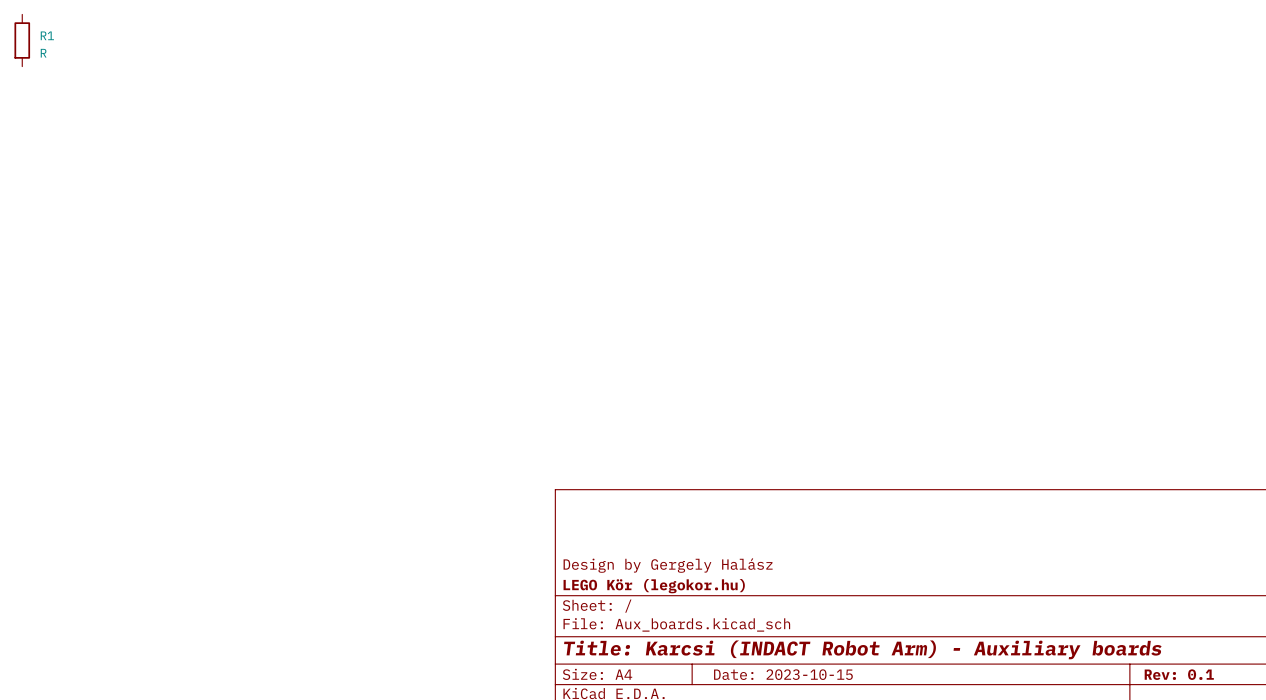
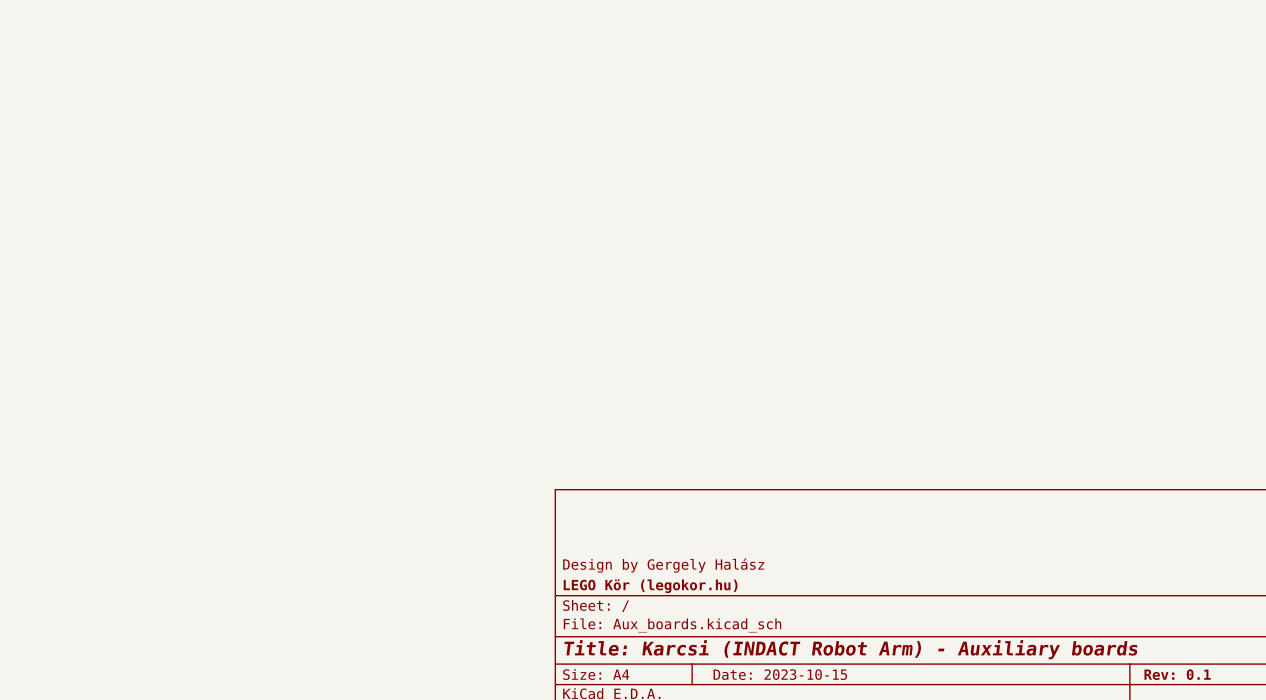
R1: R (22, 40) -> none

